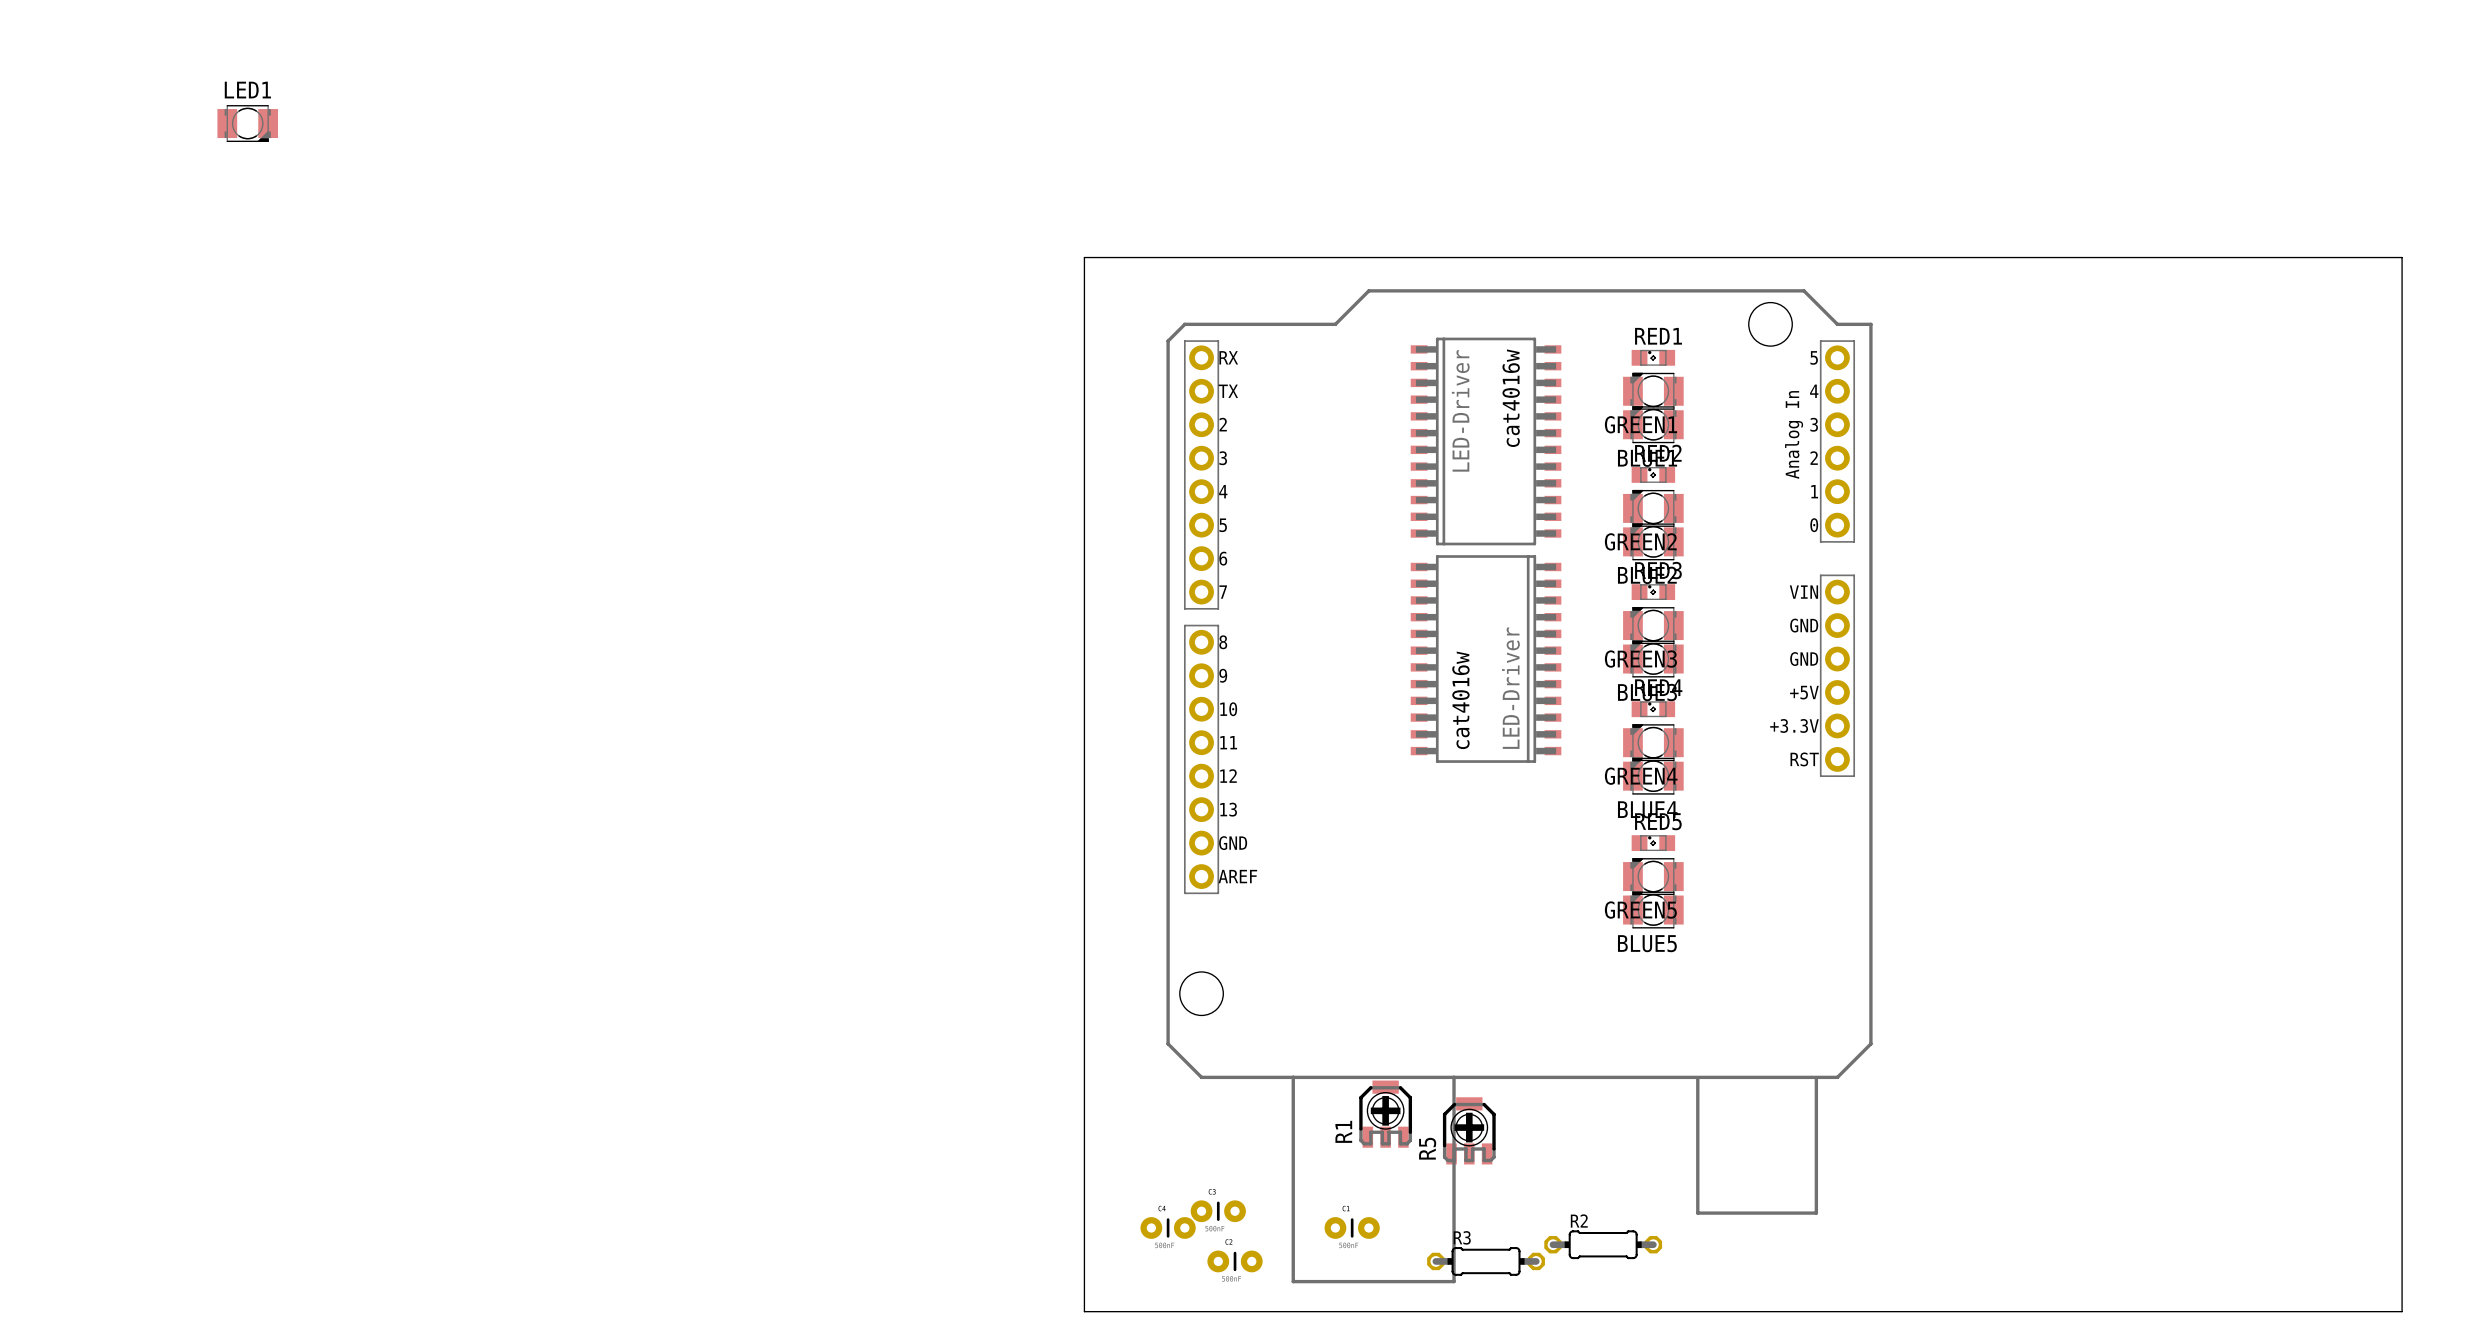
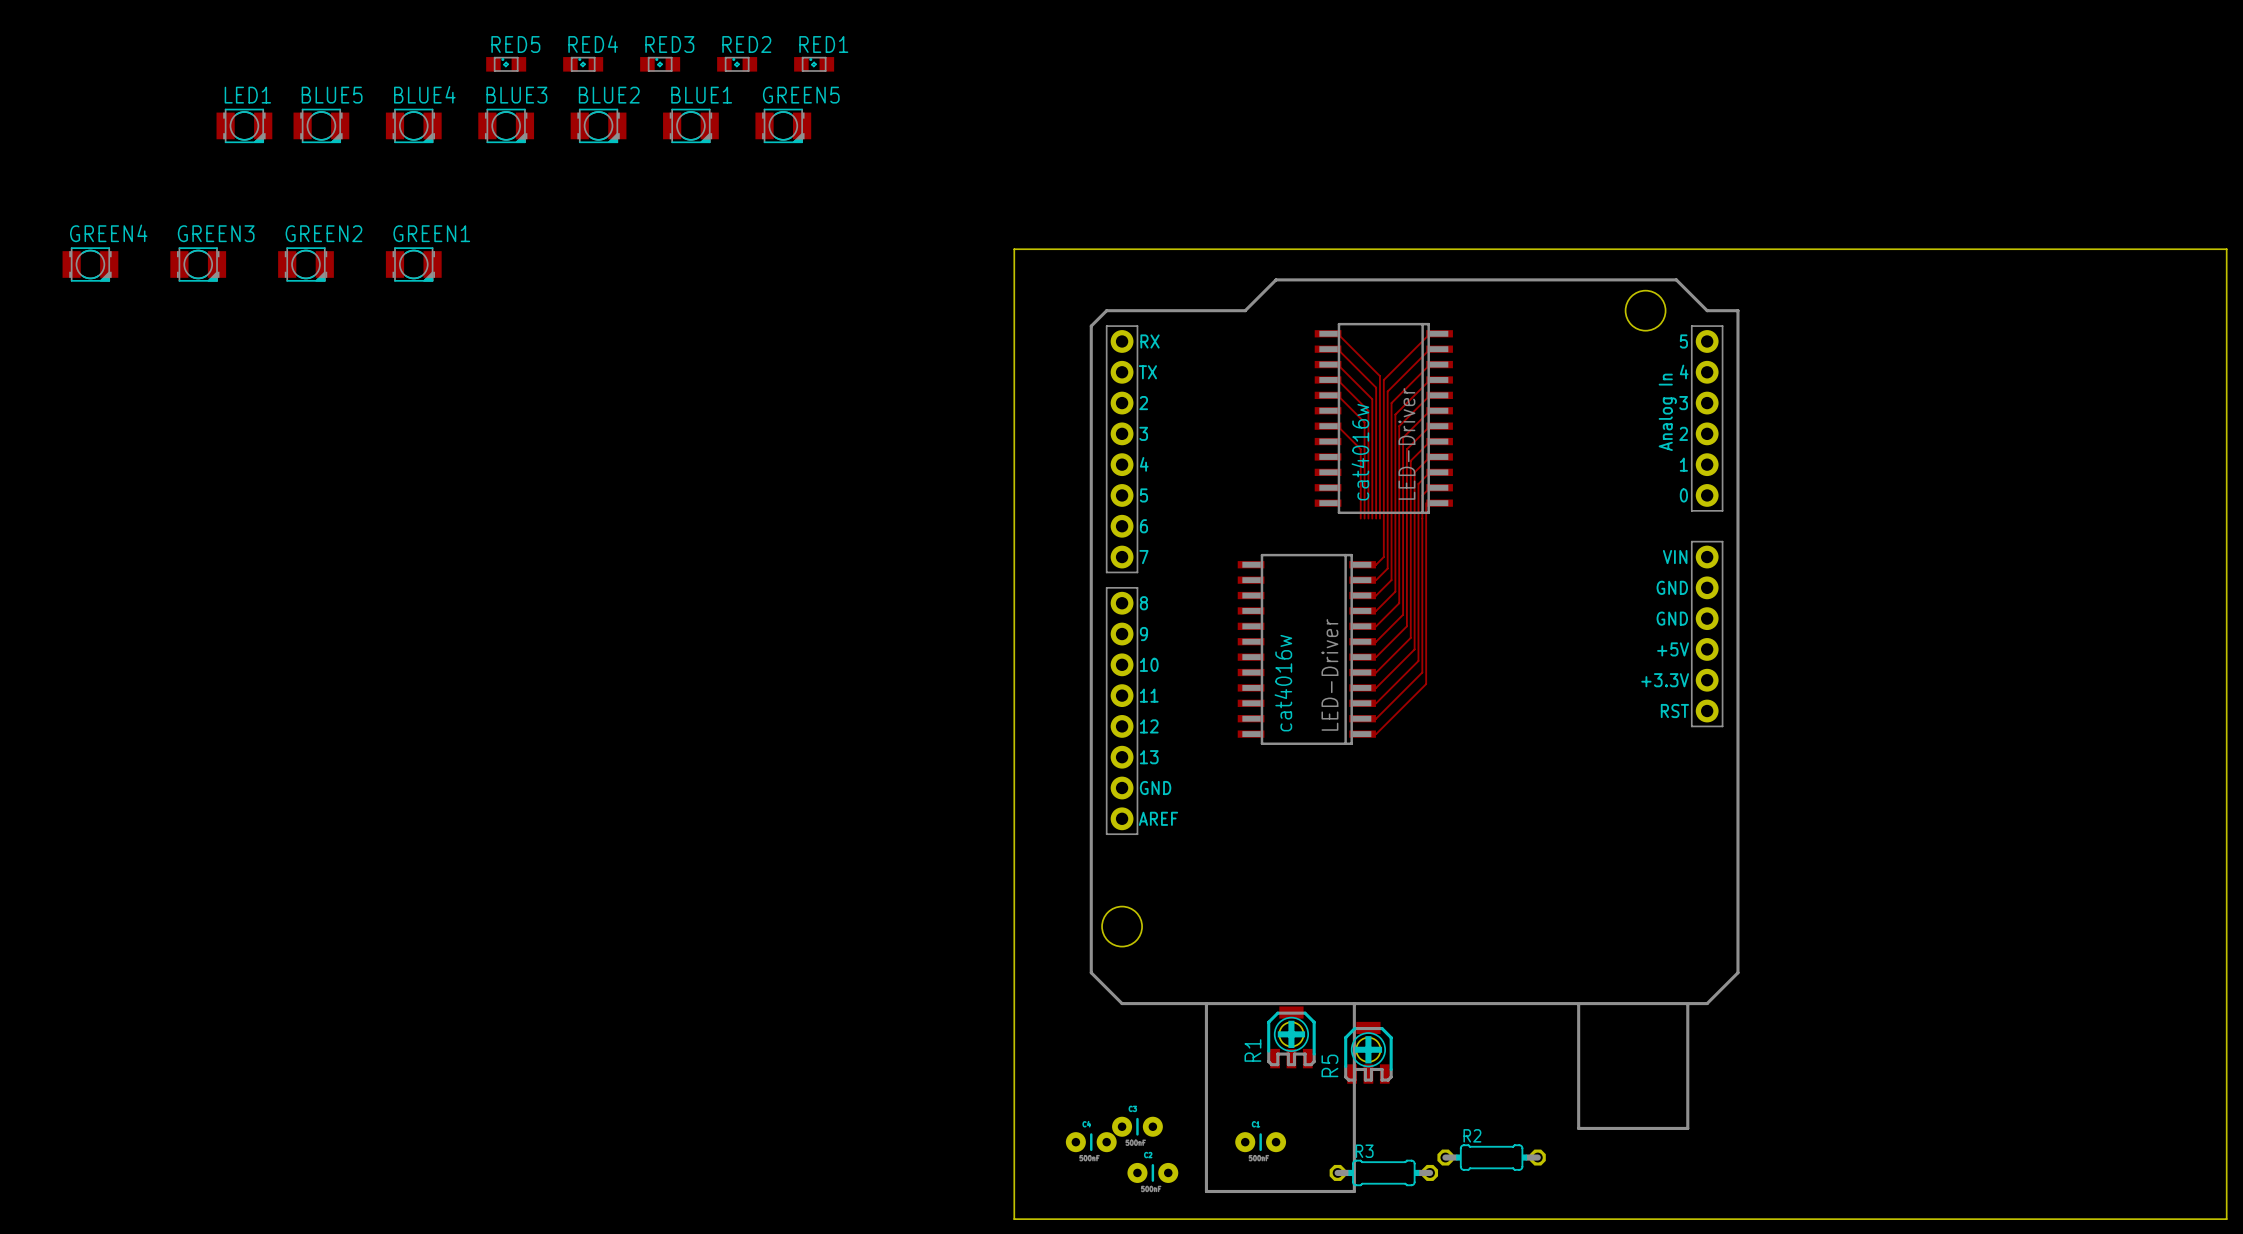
part footprint: [1410, 337, 1562, 546] -> [1314, 322, 1453, 515]
top track: none -> (1328, 333) (1337, 333) (1379, 376) (1379, 518)
top track: none -> (1439, 333) (1430, 333) (1383, 379) (1383, 557) (1376, 564) (1372, 564)
RED1 position: (1653, 357) -> (814, 64)
top track: none -> (1328, 349) (1337, 349) (1376, 387) (1376, 518)
top track: none -> (1439, 349) (1430, 349) (1387, 391) (1387, 568) (1376, 580) (1362, 580)
top track: none -> (1328, 364) (1337, 364) (1372, 399) (1372, 518)
top track: none -> (1439, 364) (1430, 364) (1391, 403) (1391, 580) (1376, 595) (1362, 595)
GREEN1 rotation: 0° (1653, 391) -> 180° (413, 264)
GREEN1 position: (1653, 391) -> (413, 264)
top track: none -> (1328, 379) (1337, 379) (1368, 410) (1368, 518)
top track: none -> (1439, 379) (1430, 379) (1395, 414) (1395, 591) (1376, 610) (1362, 610)
top track: none -> (1328, 395) (1337, 395) (1364, 422) (1364, 518)
top track: none -> (1439, 395) (1430, 395) (1399, 426) (1399, 603) (1376, 626) (1362, 626)
BLUE1 rotation: 0° (1653, 424) -> 180° (690, 125)
BLUE1 position: (1653, 424) -> (690, 125)
top track: none -> (1439, 410) (1430, 410) (1403, 437) (1403, 614) (1376, 641) (1362, 641)
top track: none -> (1328, 426) (1337, 426) (1360, 449) (1360, 518)
top track: none -> (1439, 426) (1430, 426) (1406, 449) (1406, 626) (1376, 657) (1362, 657)
top track: none -> (1439, 441) (1430, 441) (1410, 460) (1410, 637) (1376, 672) (1362, 672)
RED2 position: (1653, 474) -> (737, 64)
top track: none -> (1439, 456) (1430, 456) (1414, 472) (1414, 649) (1376, 687) (1362, 687)
top track: none -> (1439, 472) (1430, 472) (1418, 483) (1418, 660) (1376, 703) (1362, 703)
GREEN2 rotation: 0° (1653, 508) -> 180° (306, 264)
GREEN2 position: (1653, 508) -> (306, 264)
top track: none -> (1439, 487) (1430, 487) (1422, 495) (1422, 672) (1376, 718) (1362, 718)
top track: none -> (1426, 503) (1426, 684) (1376, 734) (1362, 734)
BLUE2 rotation: 0° (1653, 541) -> 180° (598, 125)
BLUE2 position: (1653, 541) -> (598, 125)
RED3 position: (1653, 592) -> (660, 64)
GREEN3 rotation: 0° (1653, 625) -> 180° (198, 264)
GREEN3 position: (1653, 625) -> (198, 264)
part: (1486, 659) -> none
BLUE3 rotation: 0° (1653, 659) -> 180° (506, 125)
BLUE3 position: (1653, 659) -> (506, 125)
part: none -> (1306, 649)
RED4 position: (1653, 709) -> (583, 64)
GREEN4 rotation: 0° (1653, 742) -> 180° (90, 264)
GREEN4 position: (1653, 742) -> (90, 264)
BLUE4 rotation: 0° (1653, 776) -> 180° (413, 125)
BLUE4 position: (1653, 776) -> (413, 125)
RED5 position: (1653, 843) -> (506, 64)
GREEN5 rotation: 0° (1653, 876) -> 180° (783, 125)
GREEN5 position: (1653, 876) -> (783, 125)
BLUE5 rotation: 0° (1653, 910) -> 180° (321, 125)
BLUE5 position: (1653, 910) -> (321, 125)

